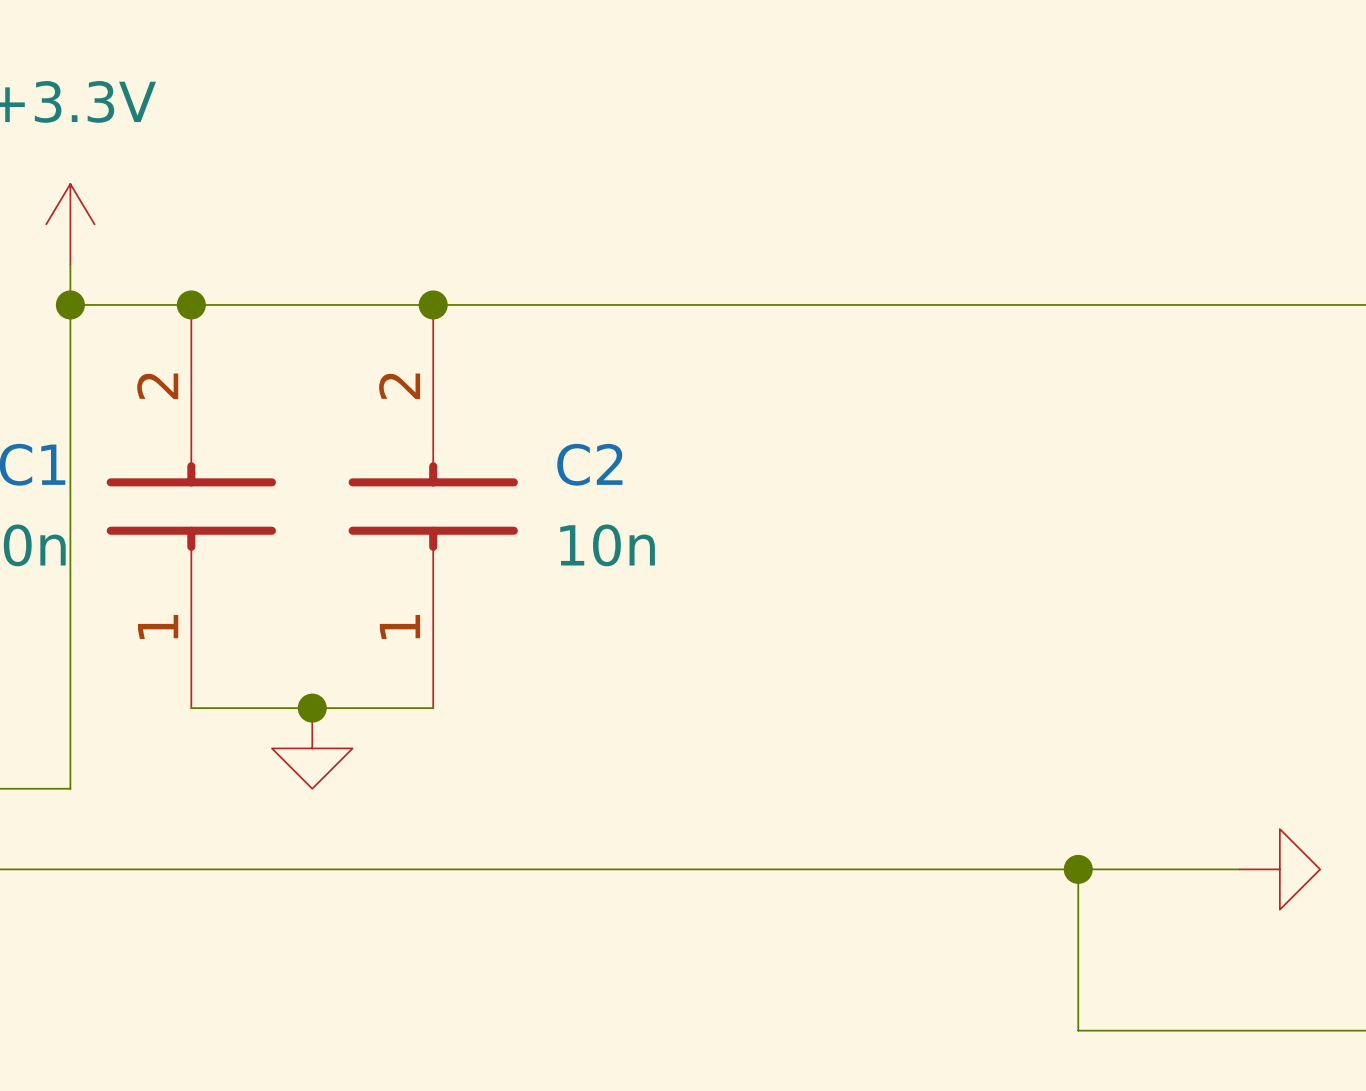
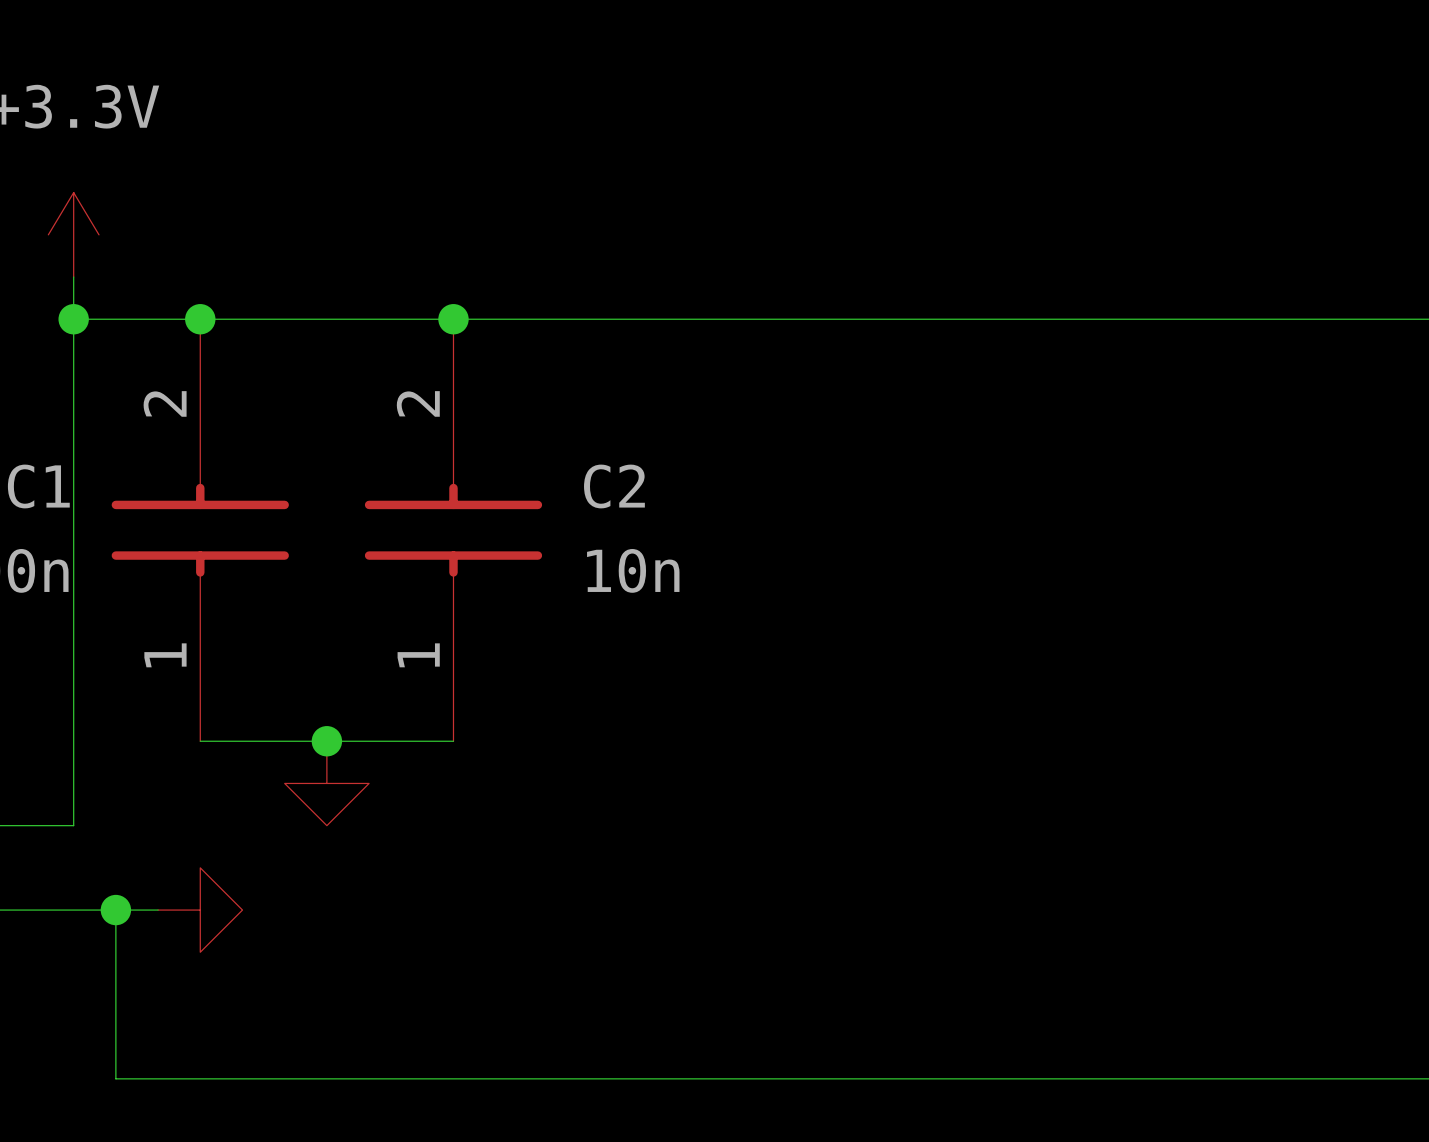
junction: none -> (115, 910)
wire: (151, 869) (1239, 869) -> none
power symbol: none -> (200, 910)
wire: (1078, 869) (1078, 1030) -> (115, 910) (115, 1078) (1128, 1078)
junction: (1078, 869) -> none
power symbol: (1279, 869) -> none

